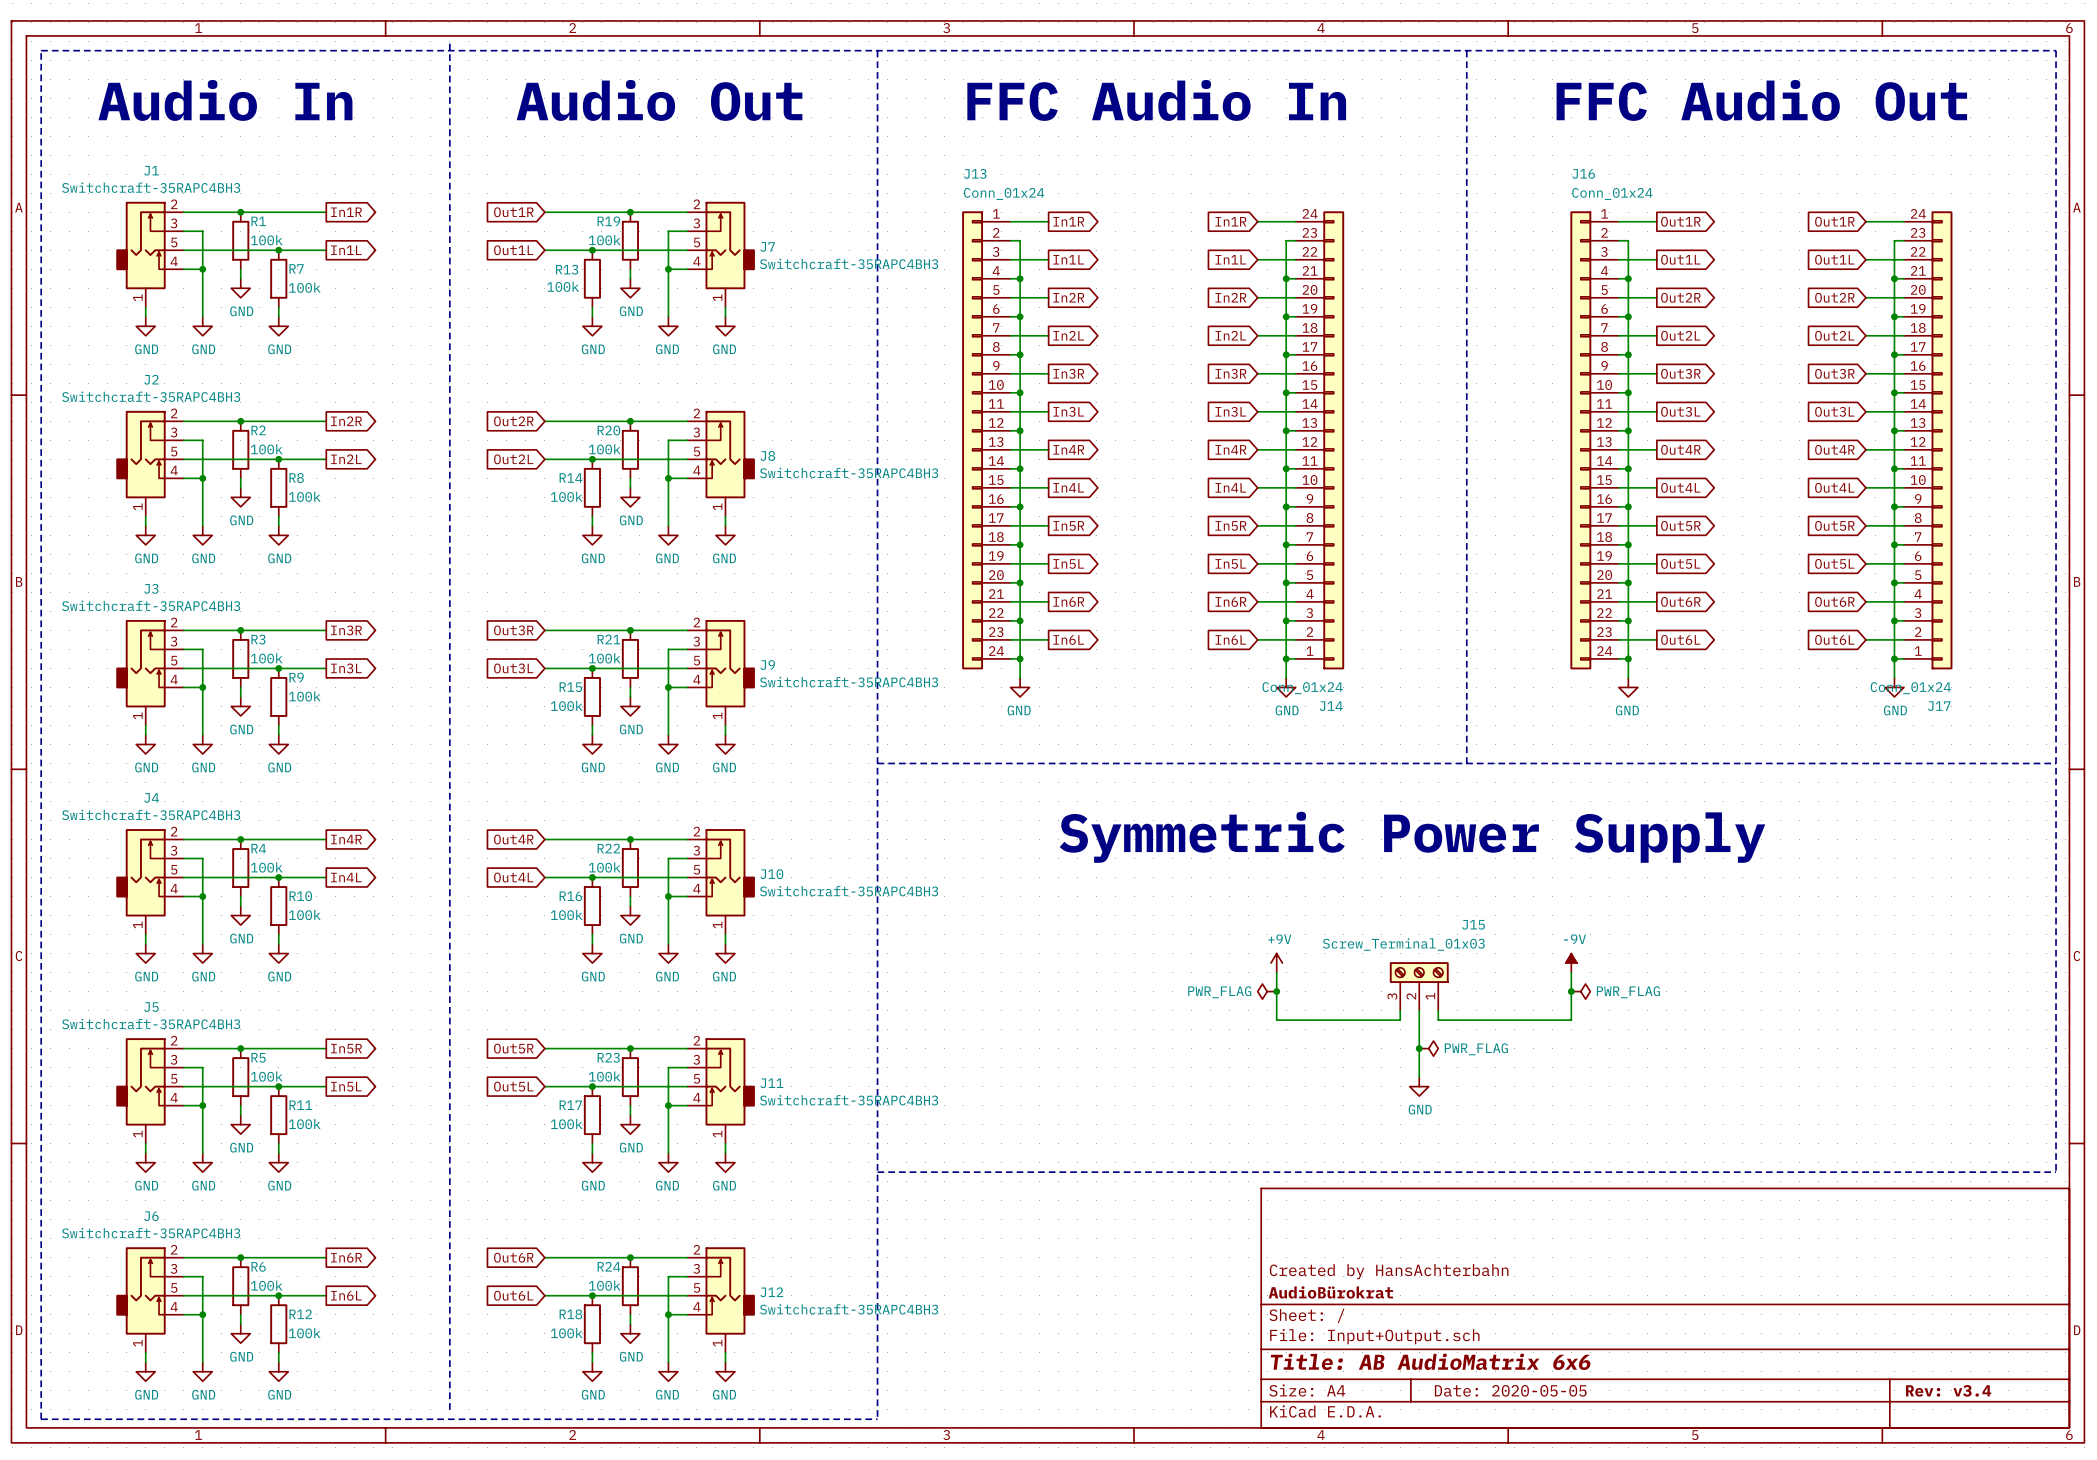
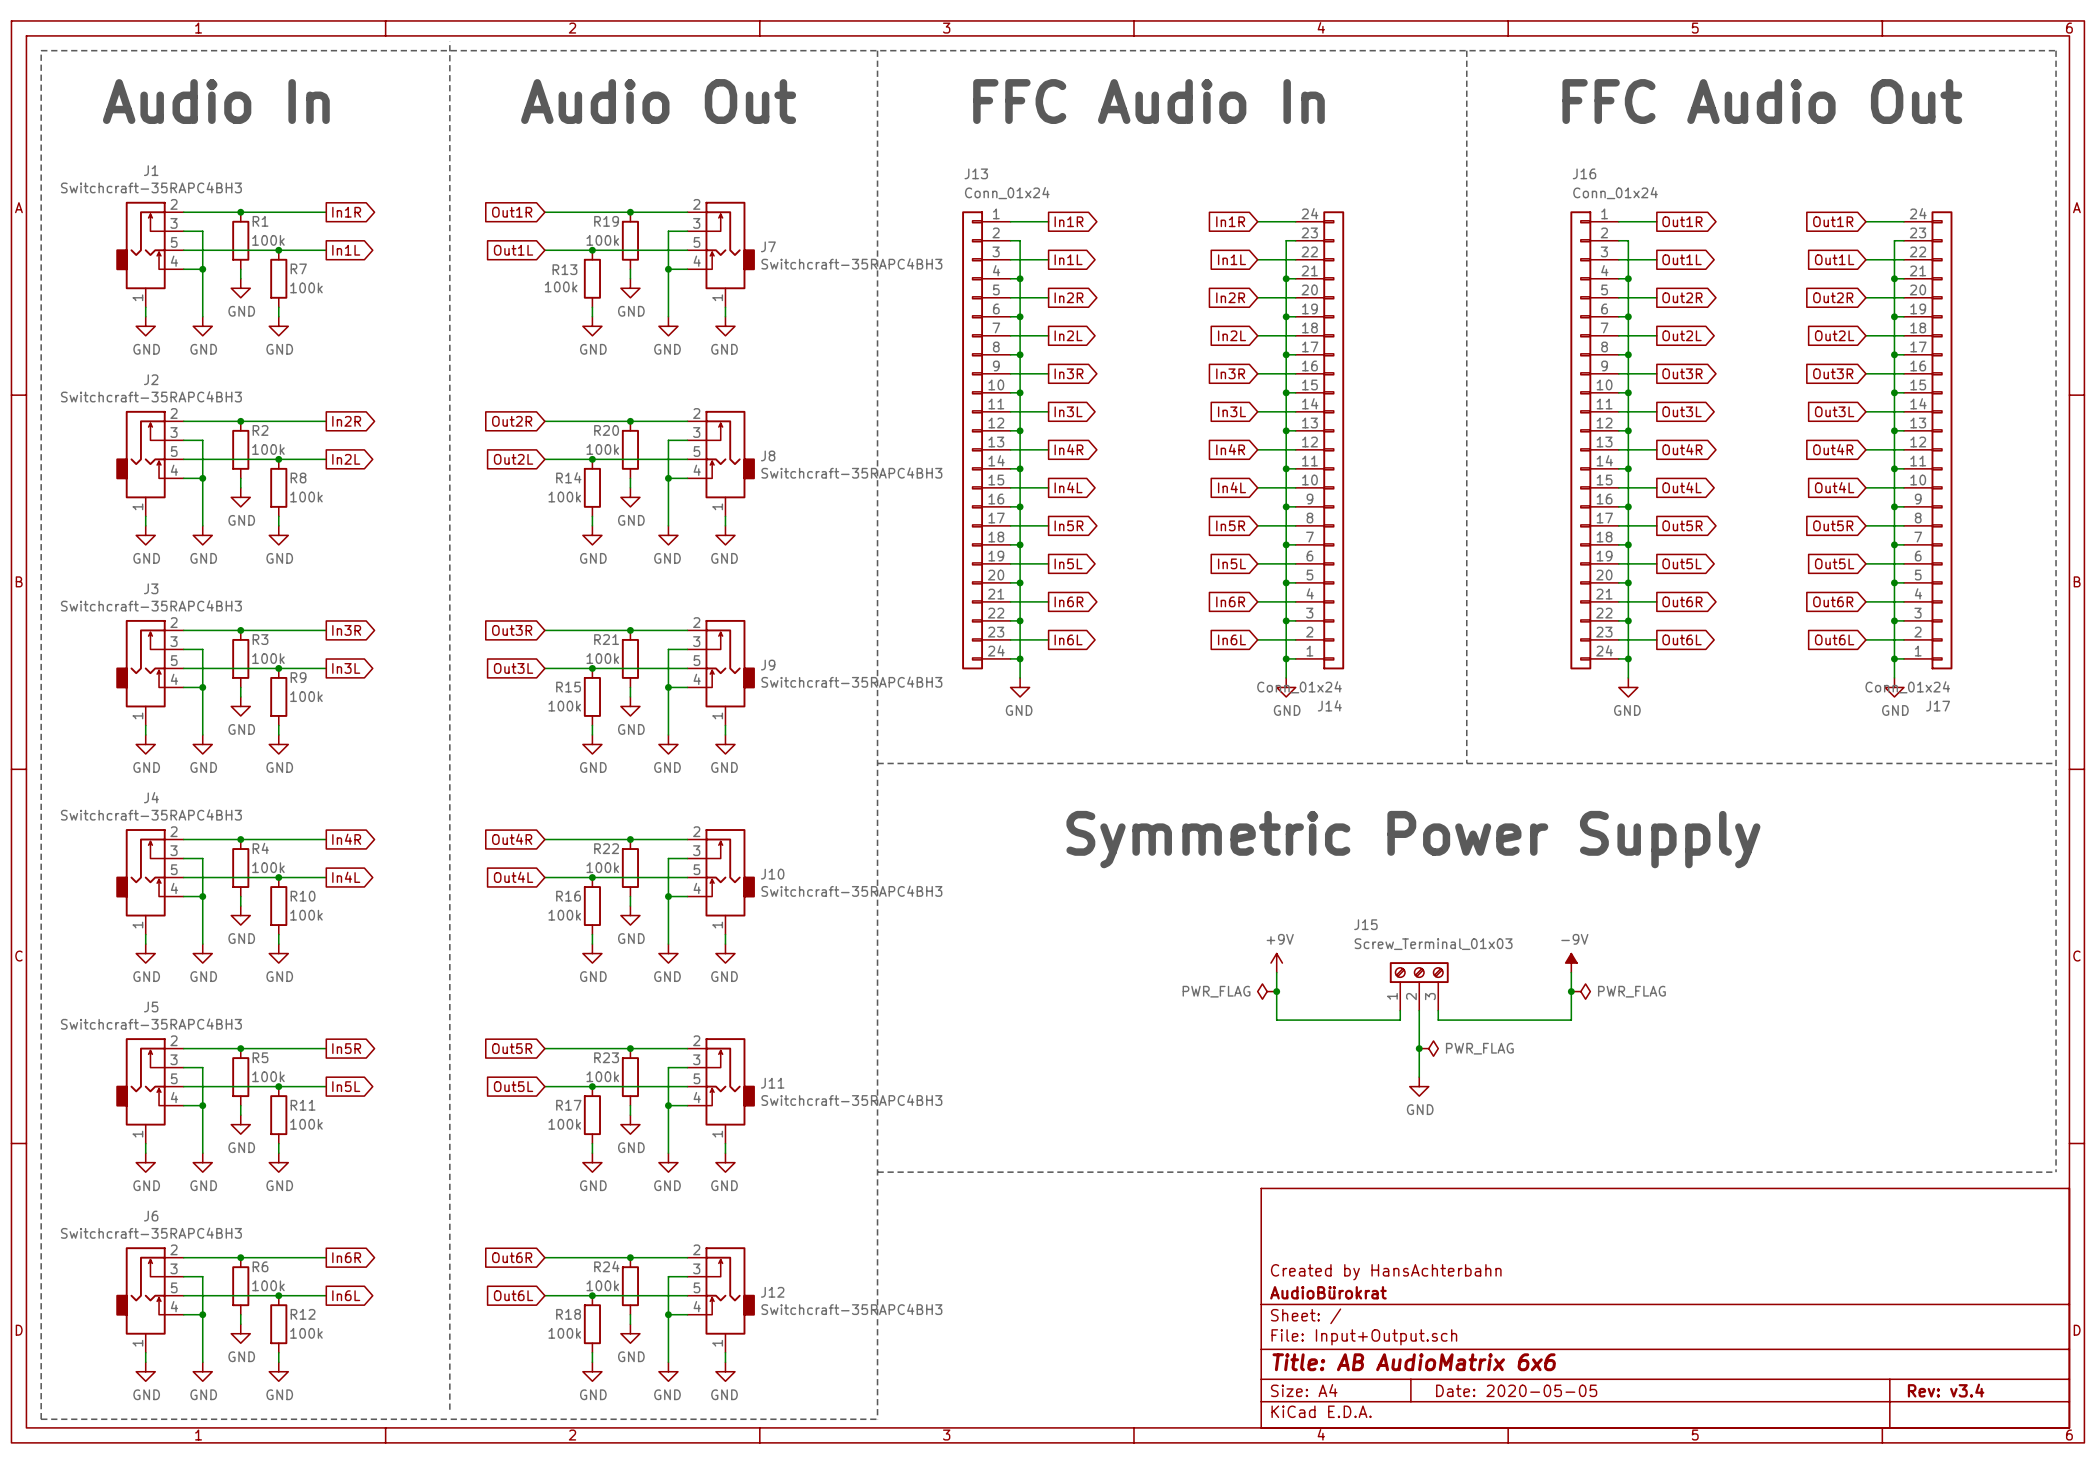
J15 flip: as is (1419, 972) -> left-right (1419, 972)

